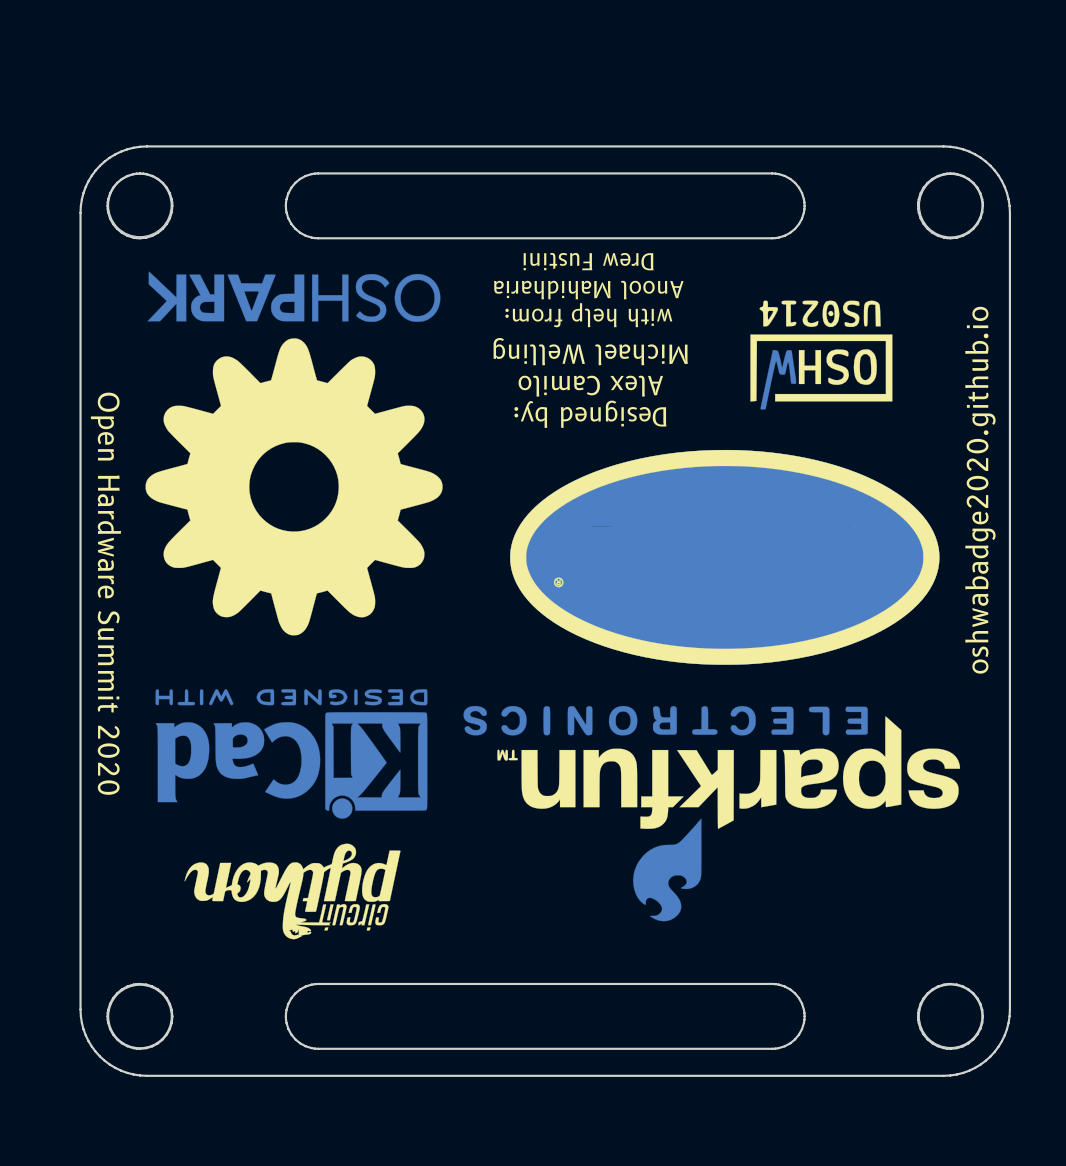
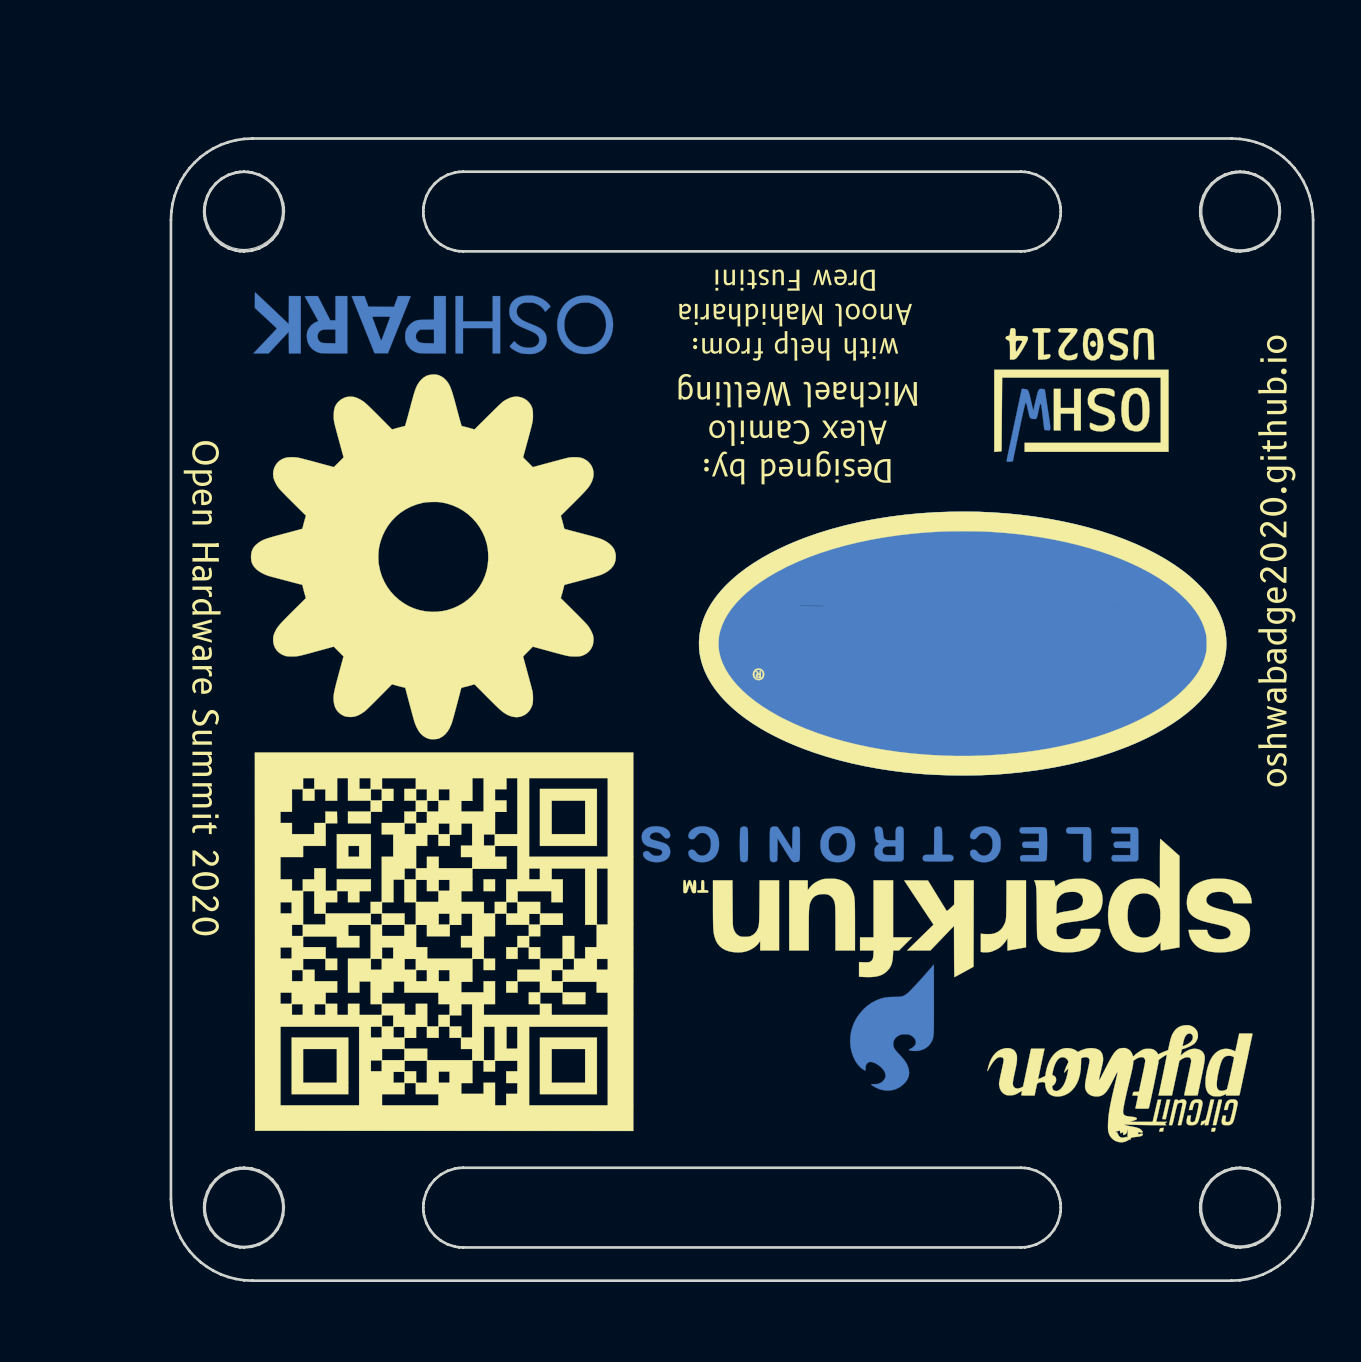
drawing shape: [145, 271, 961, 922] -> [250, 292, 1252, 1132]
drawing: [155, 689, 428, 940] -> none
drawing: none -> [987, 1024, 1253, 1143]

